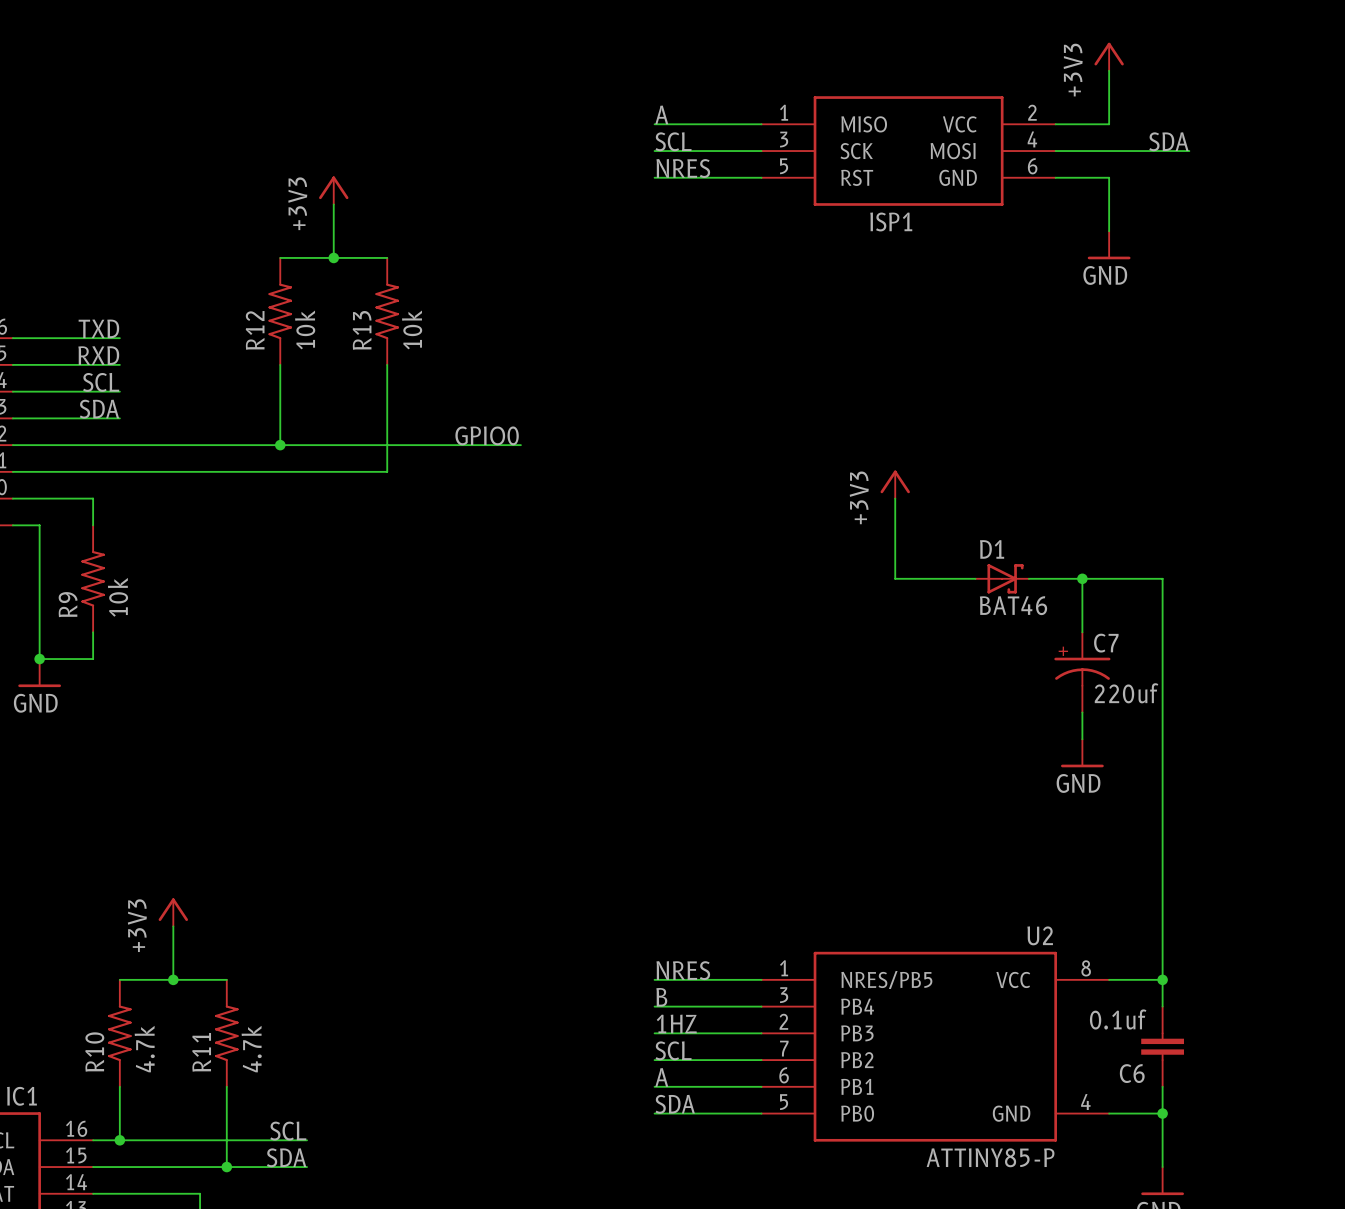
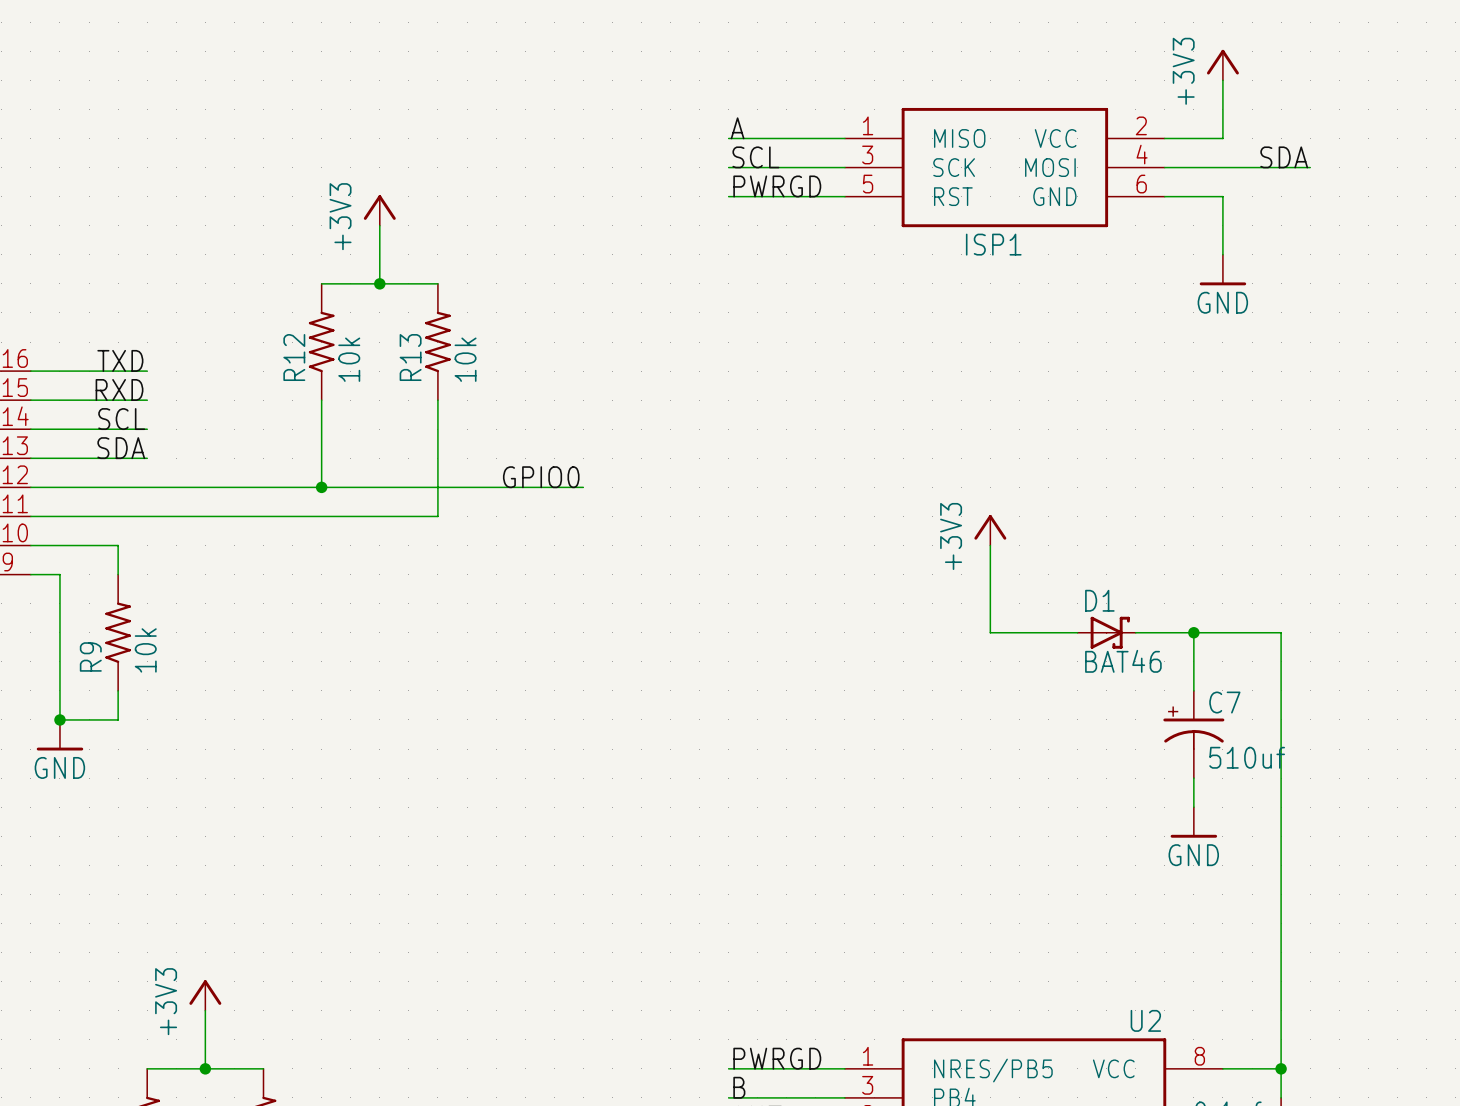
label: NRES (683, 168) -> PWRGD (777, 186)
C7 value: 220uf (1126, 693) -> 510uf (1247, 757)
label: NRES (683, 970) -> PWRGD (777, 1058)

